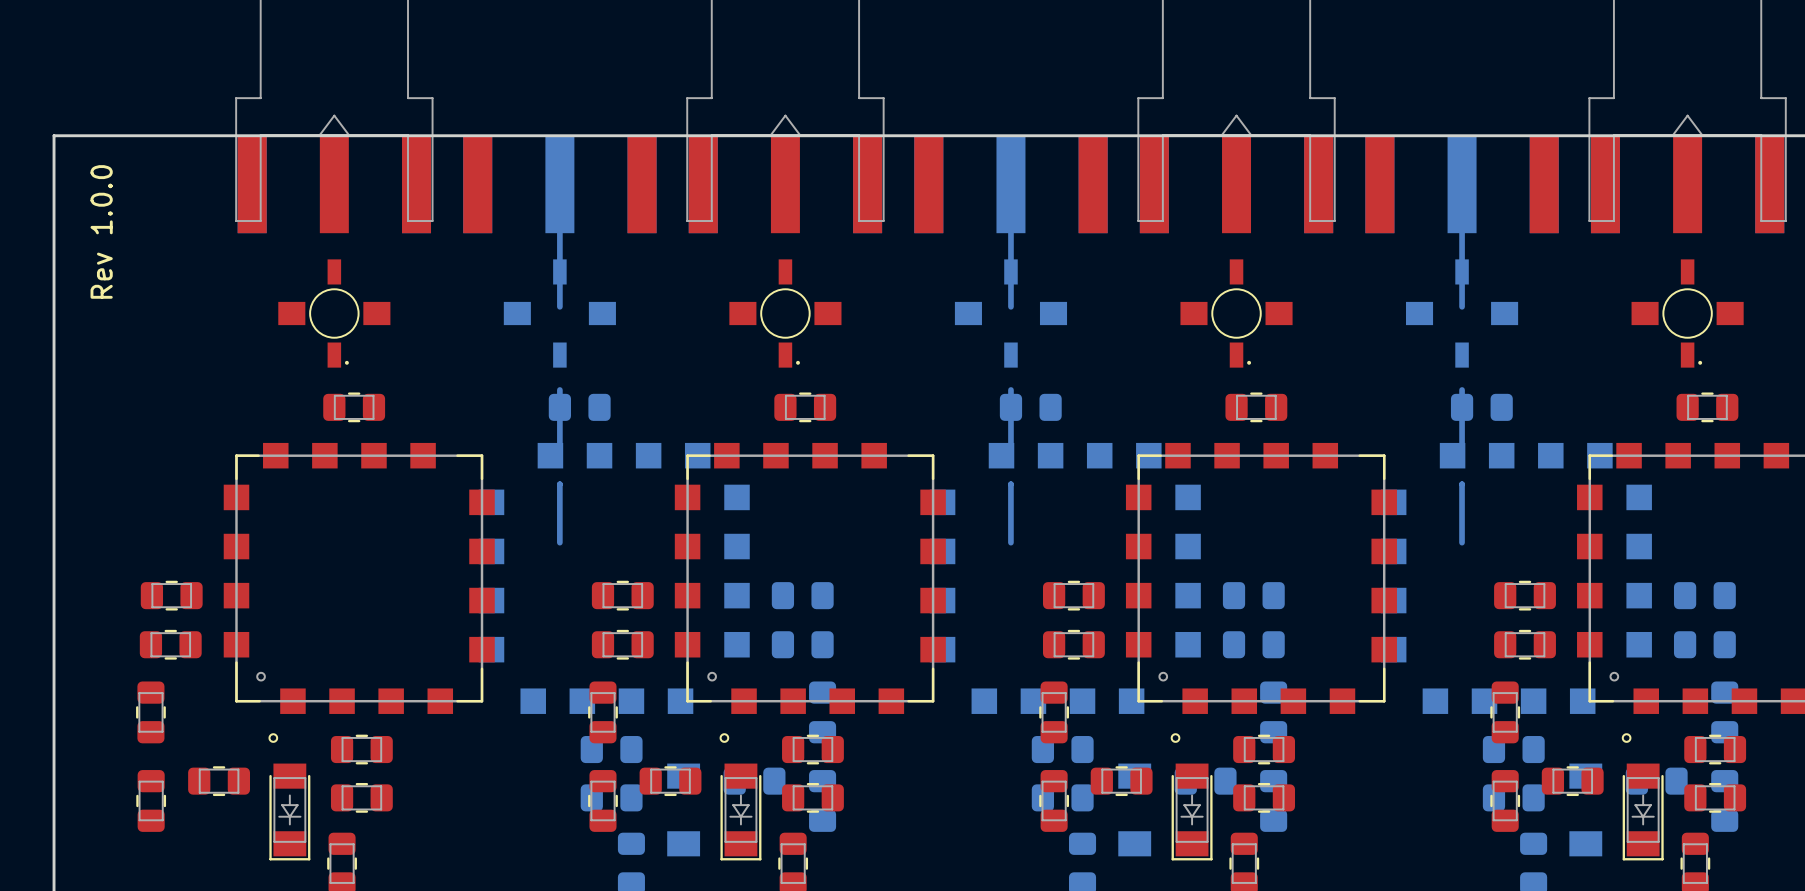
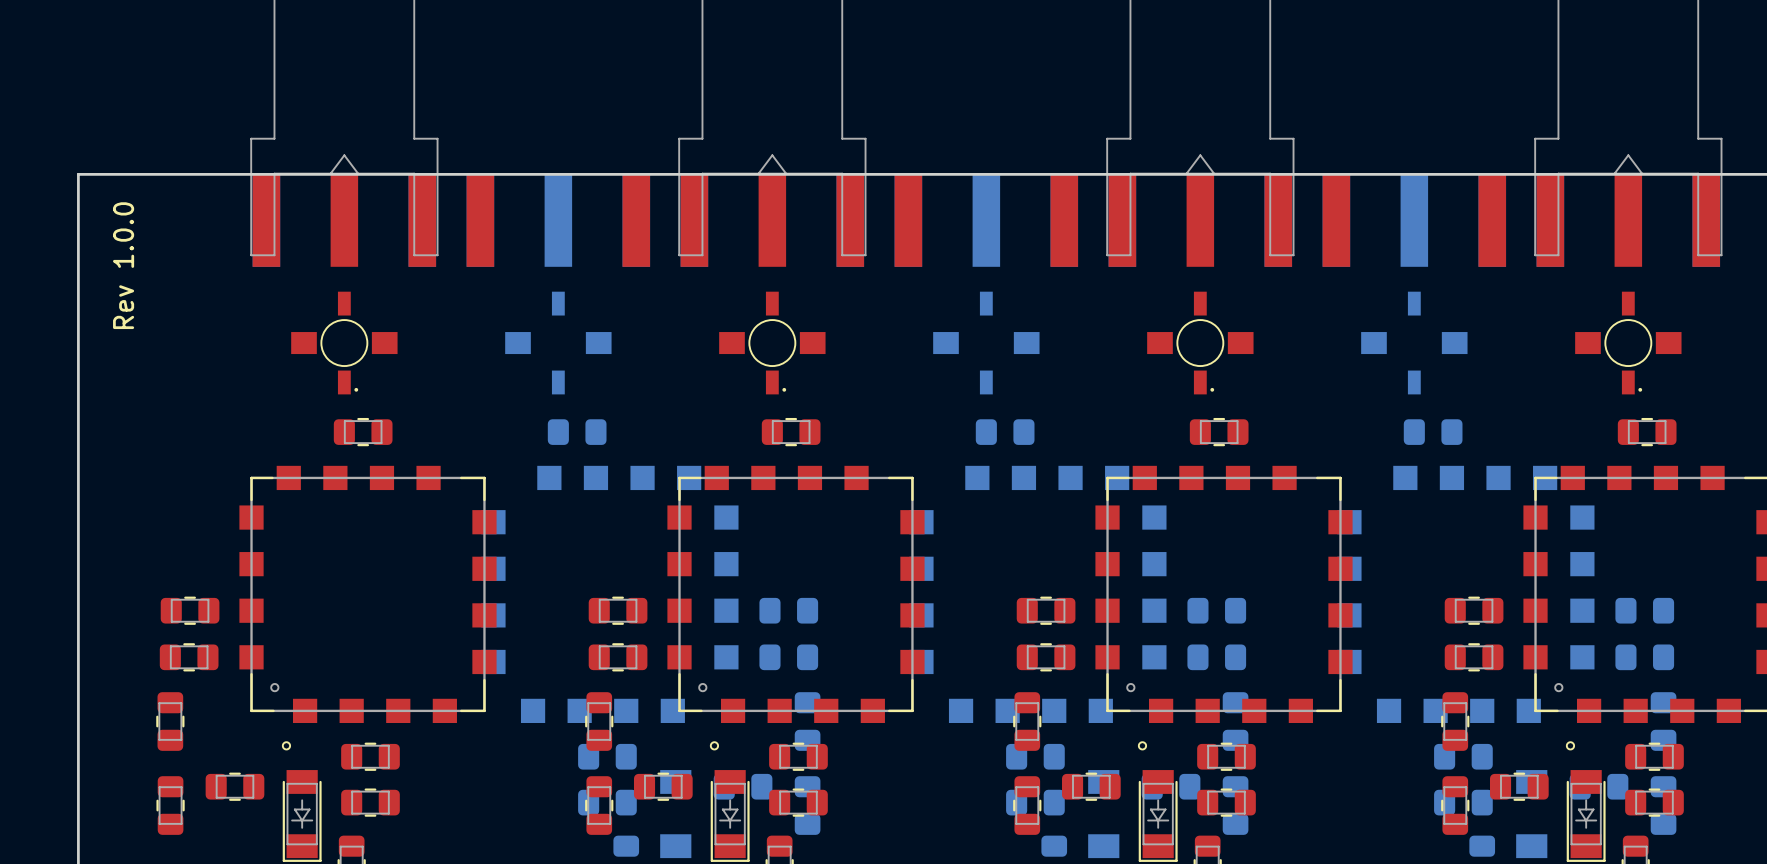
bottom track: (559, 184) (559, 306) -> none
bottom track: (1010, 184) (1010, 306) -> none
bottom track: (1462, 184) (1462, 306) -> none
bottom track: (559, 389) (559, 444) -> none
bottom track: (1010, 389) (1010, 444) -> none
bottom track: (1462, 389) (1462, 444) -> none
bottom track: (559, 484) (559, 542) -> none
bottom track: (1010, 484) (1010, 542) -> none
bottom track: (1462, 484) (1462, 542) -> none

